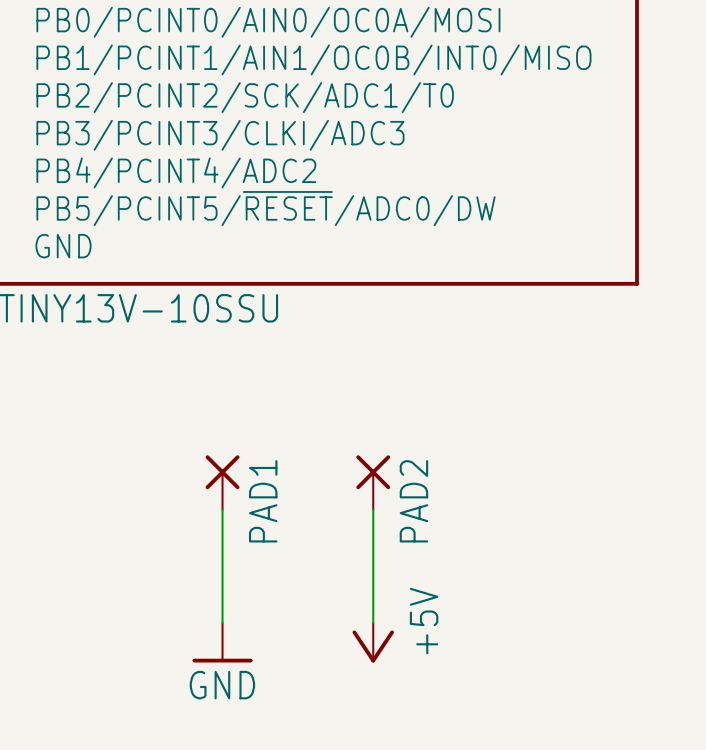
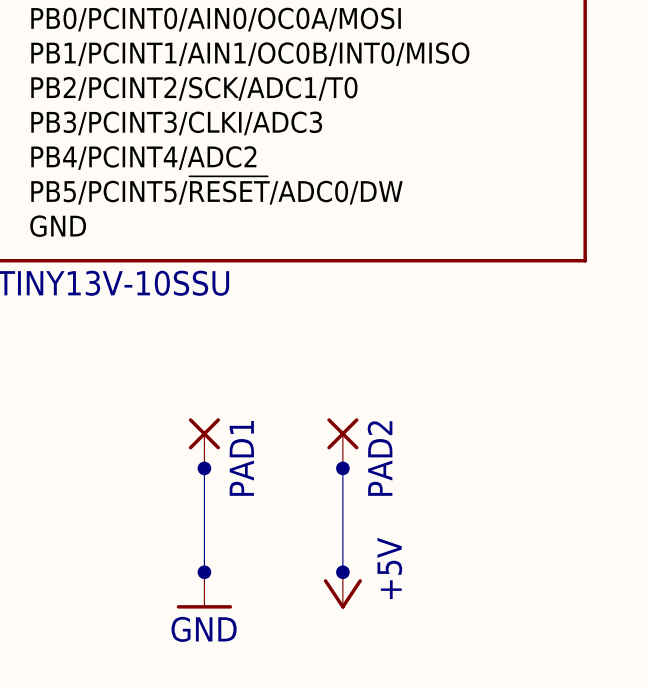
junction: none -> (204, 468)
junction: none -> (342, 468)
junction: none -> (204, 572)
junction: none -> (342, 572)

